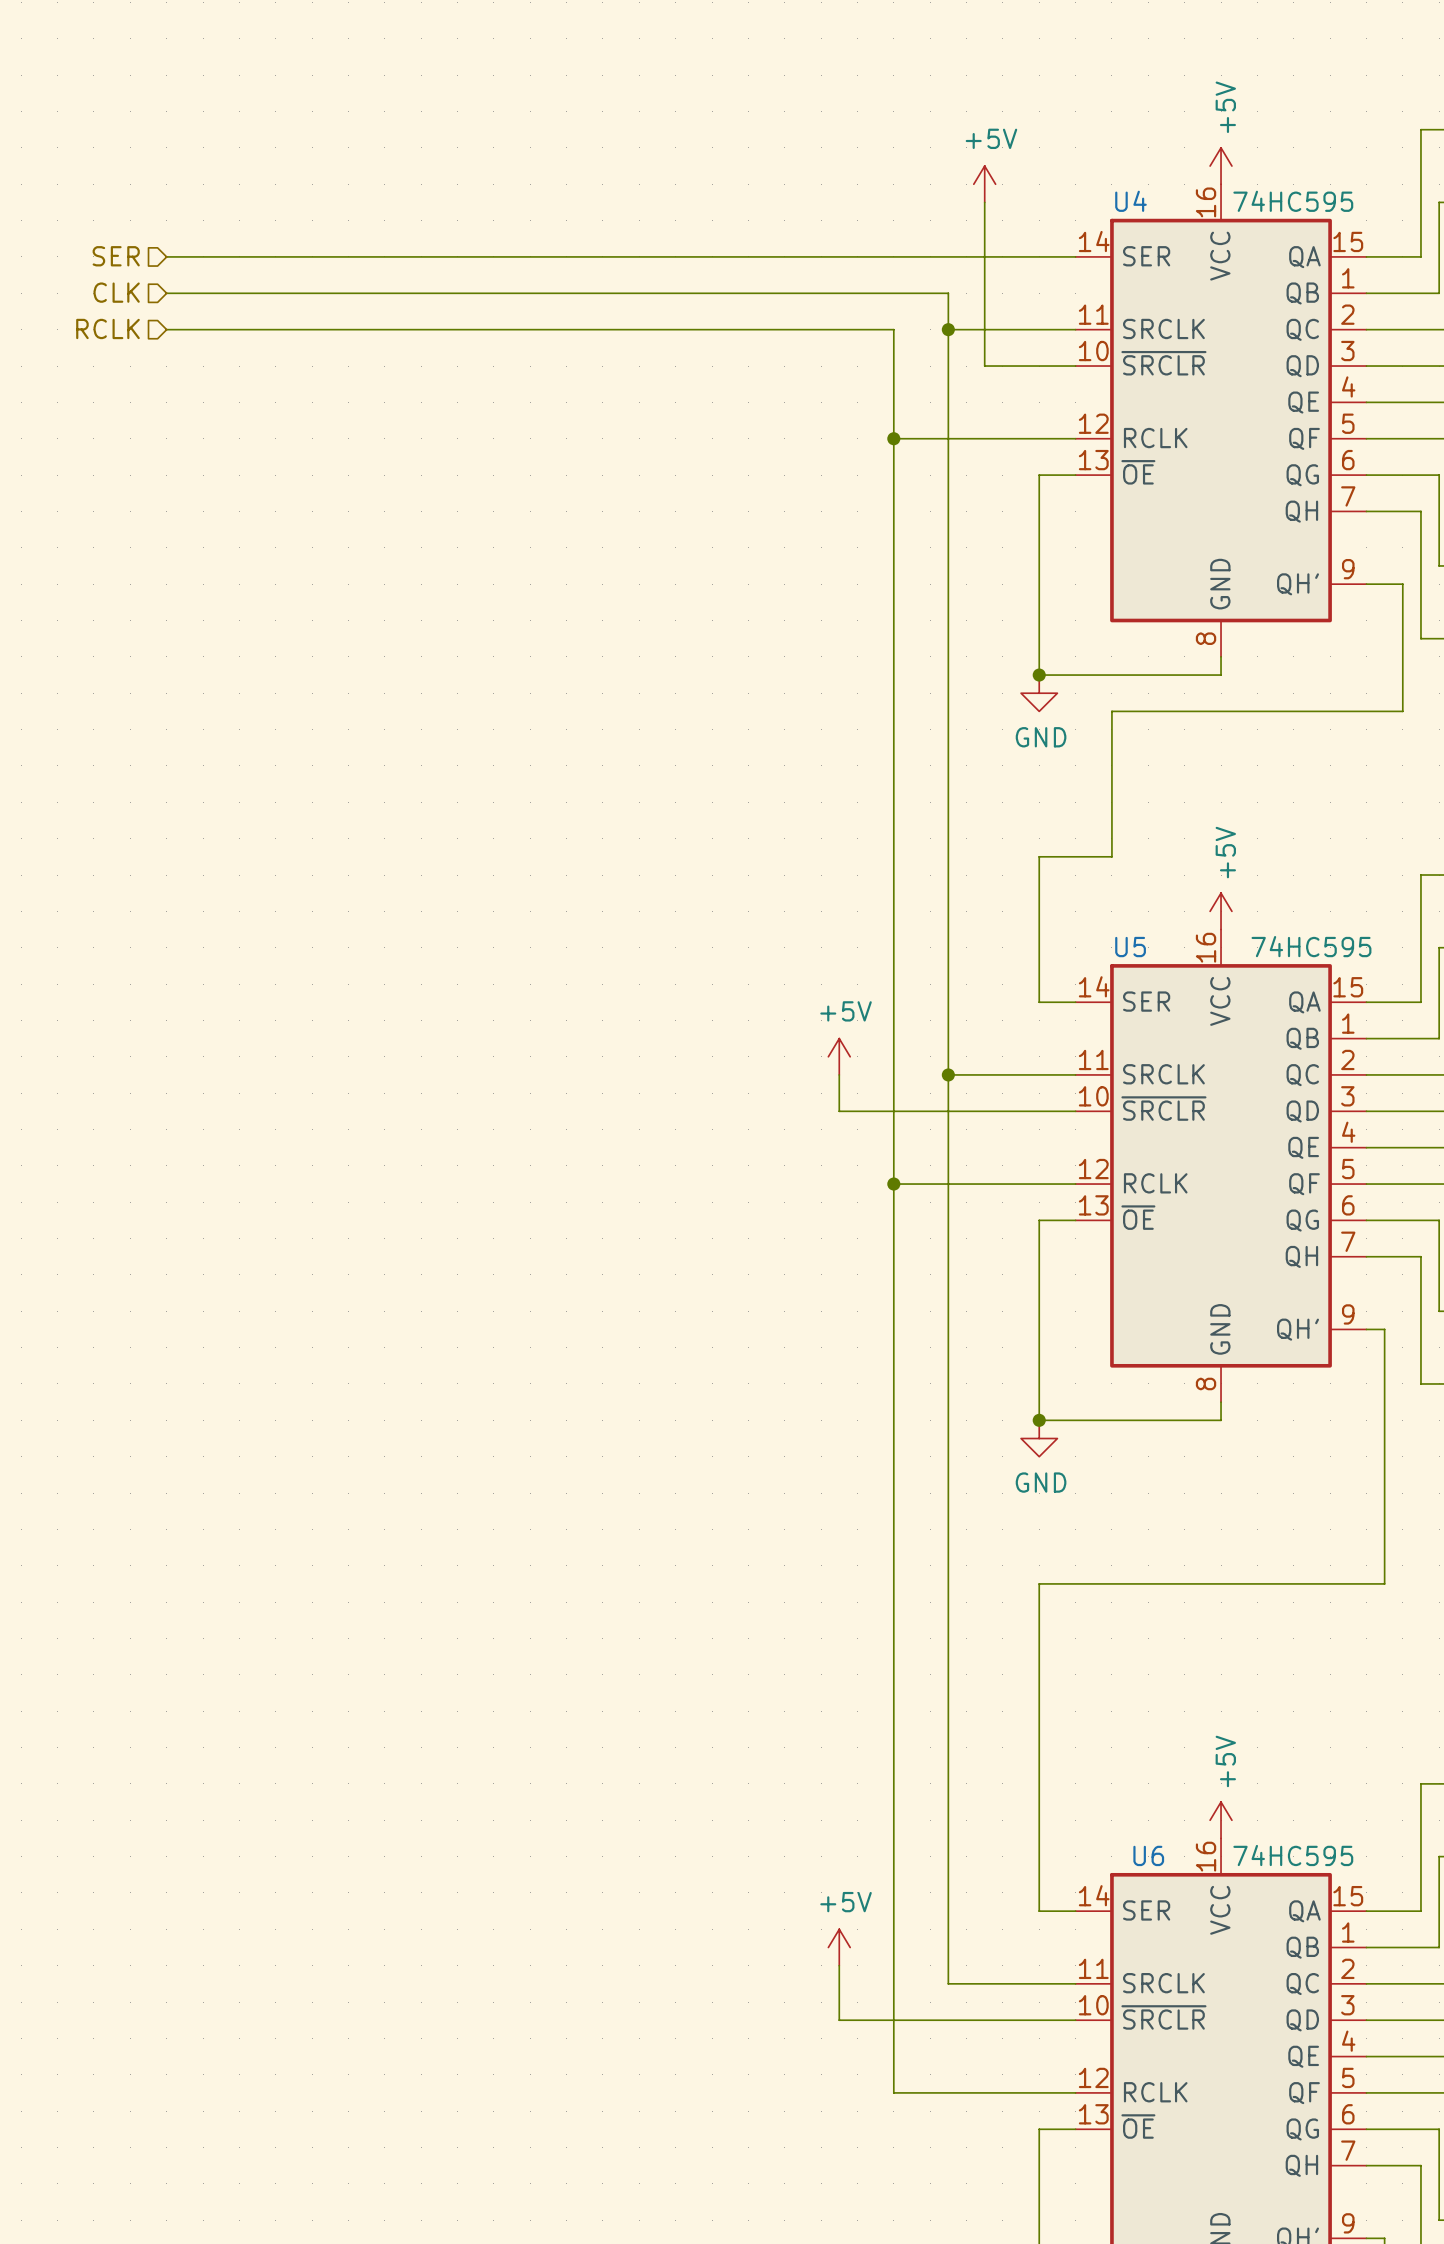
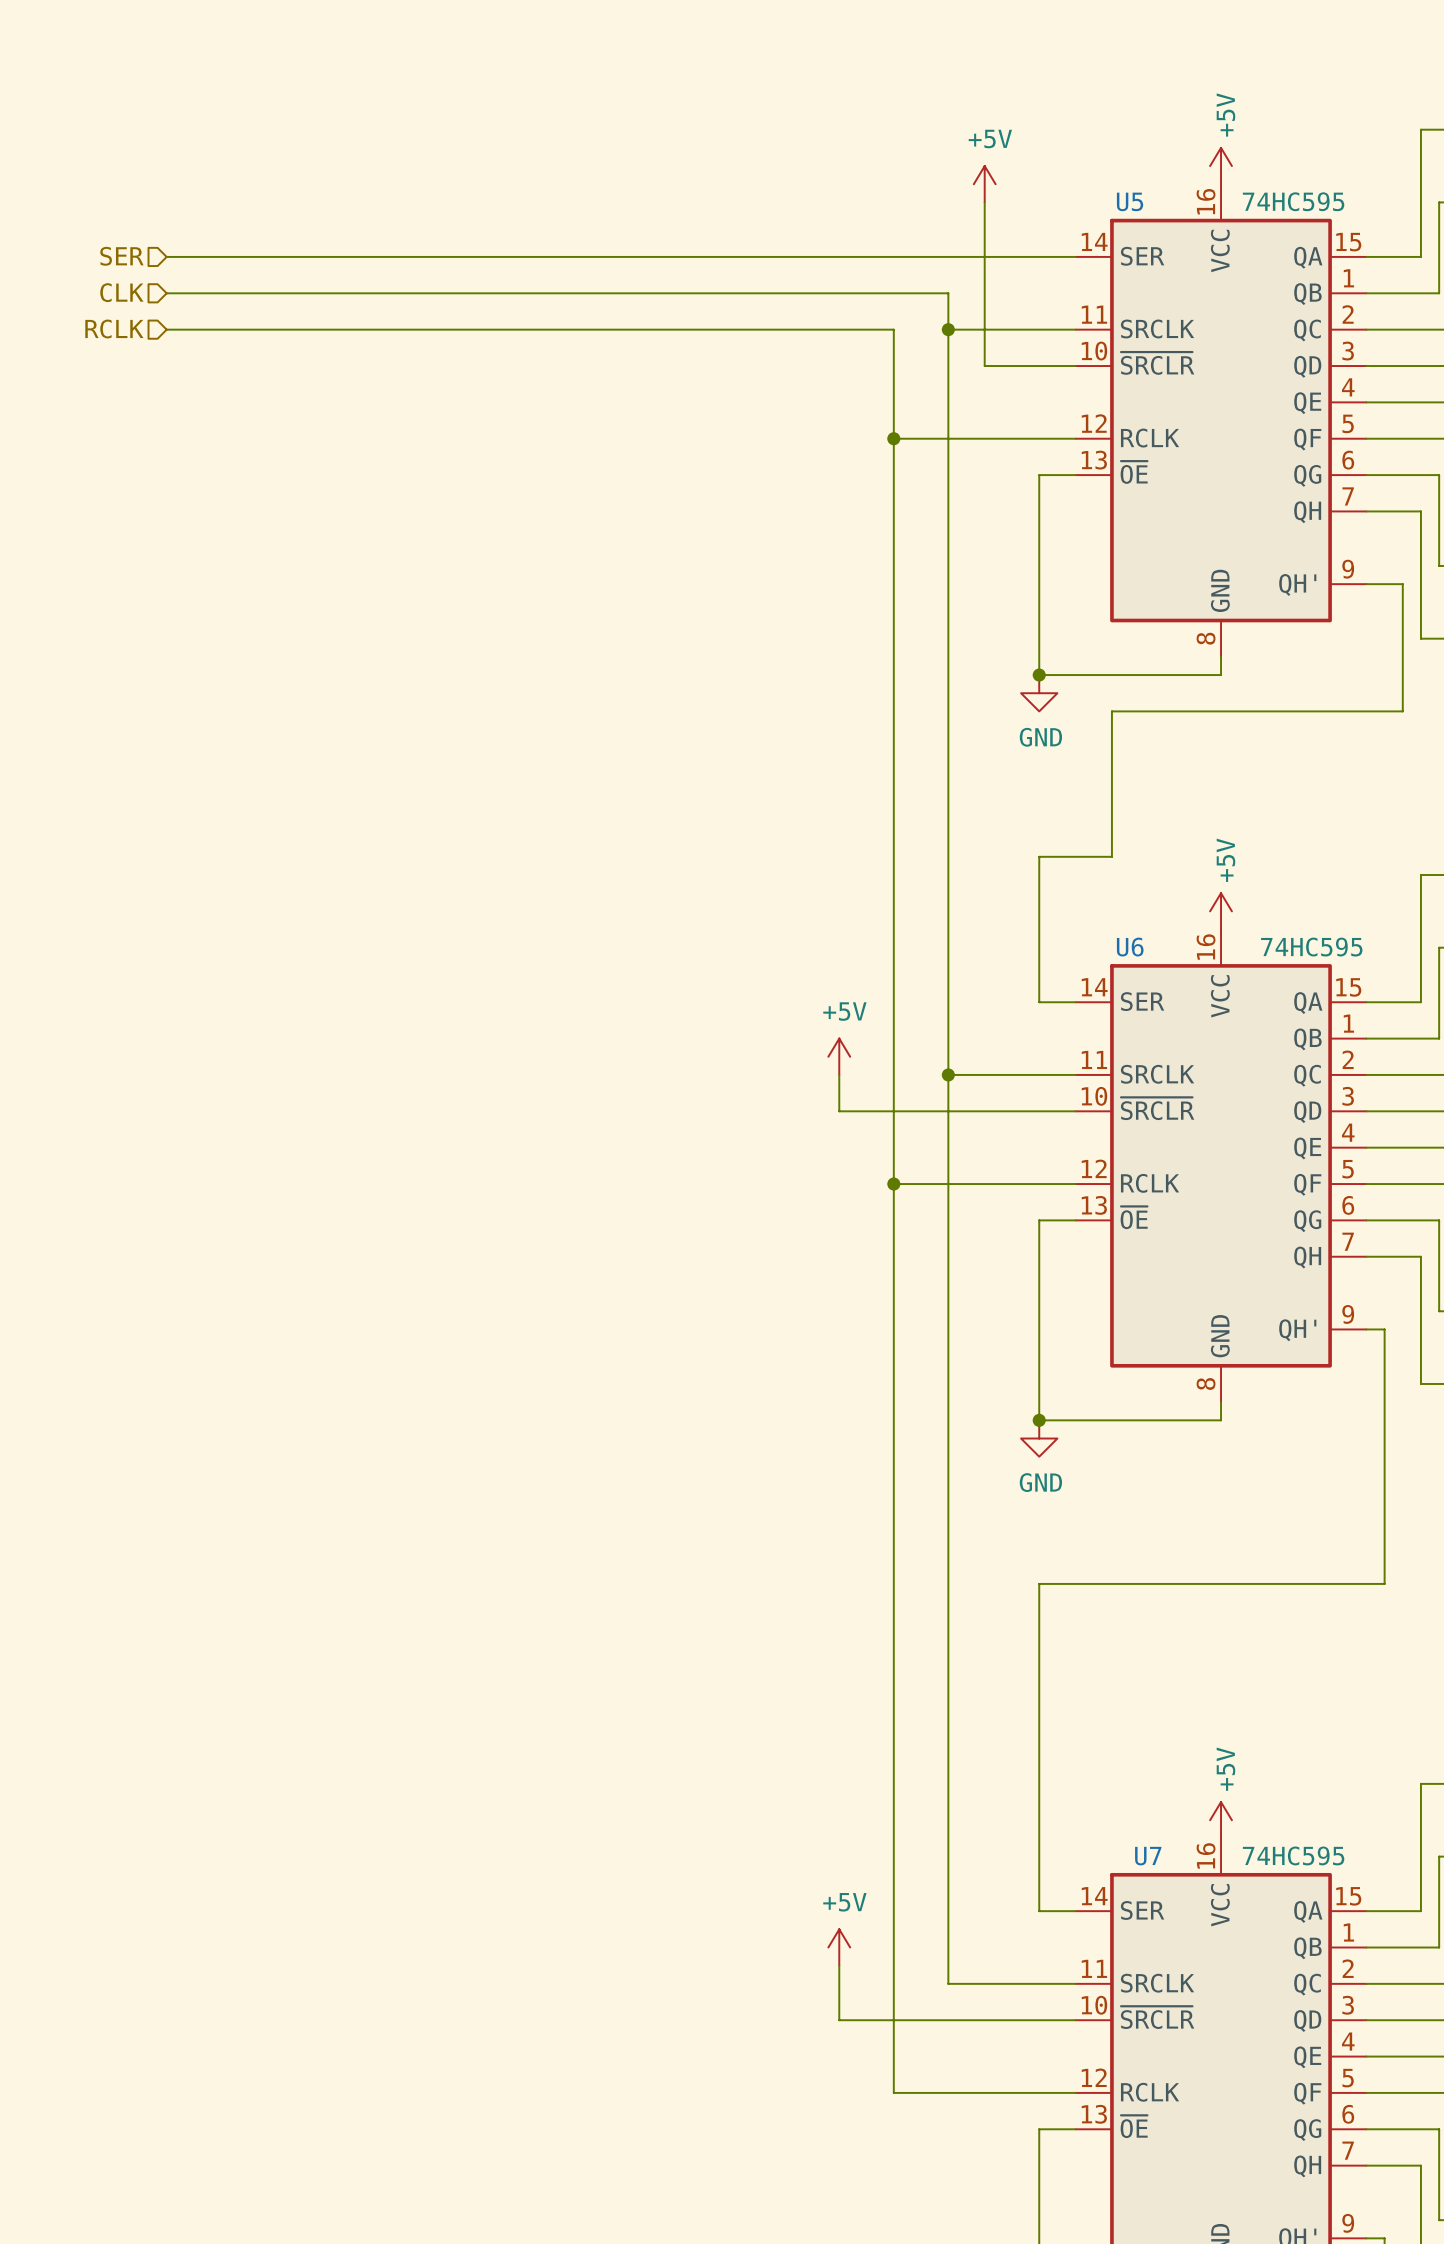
U4 name: U4 (1130, 201) -> U5 (1130, 201)
U5 name: U5 (1130, 947) -> U6 (1130, 947)
U6 name: U6 (1148, 1855) -> U7 (1148, 1856)

